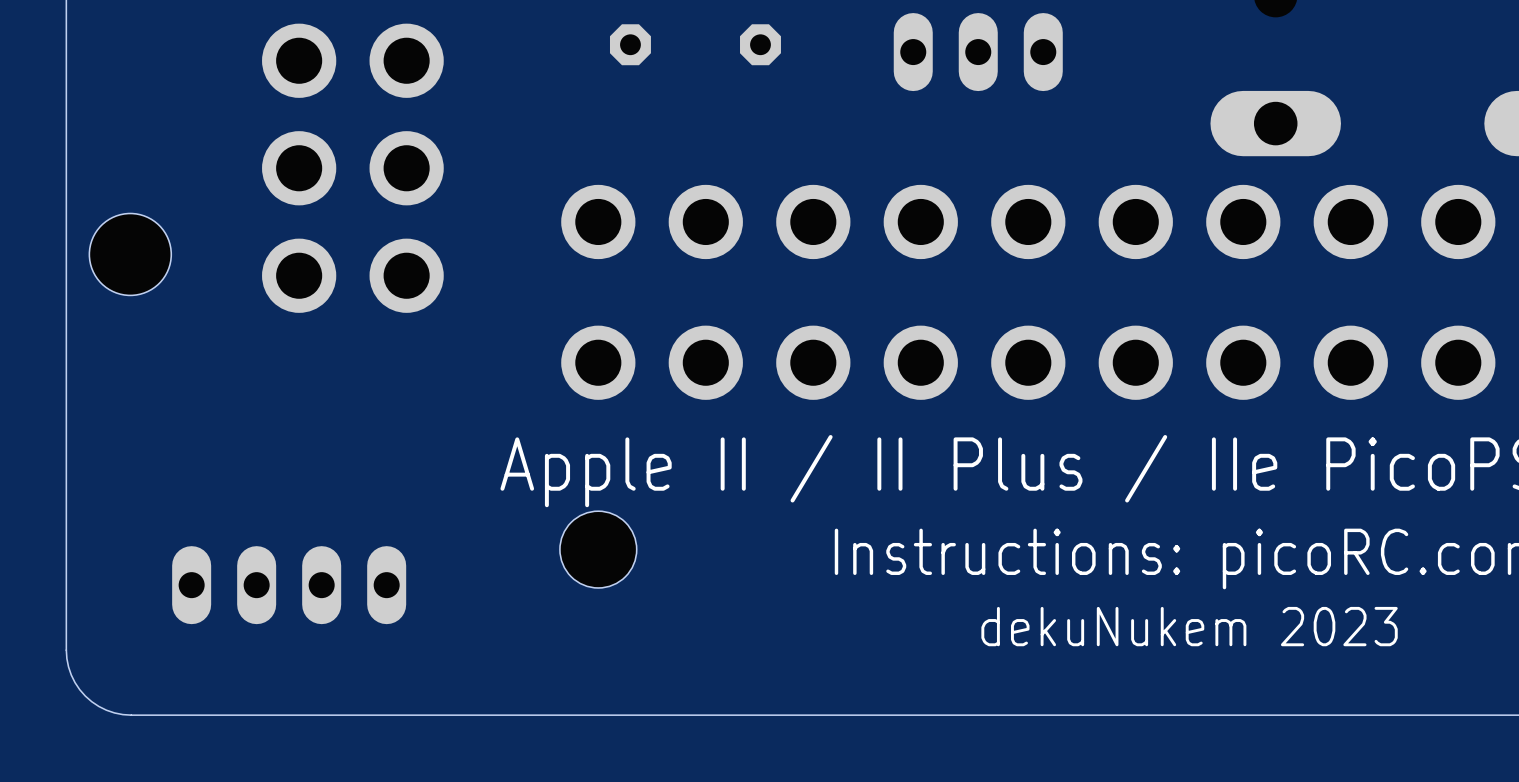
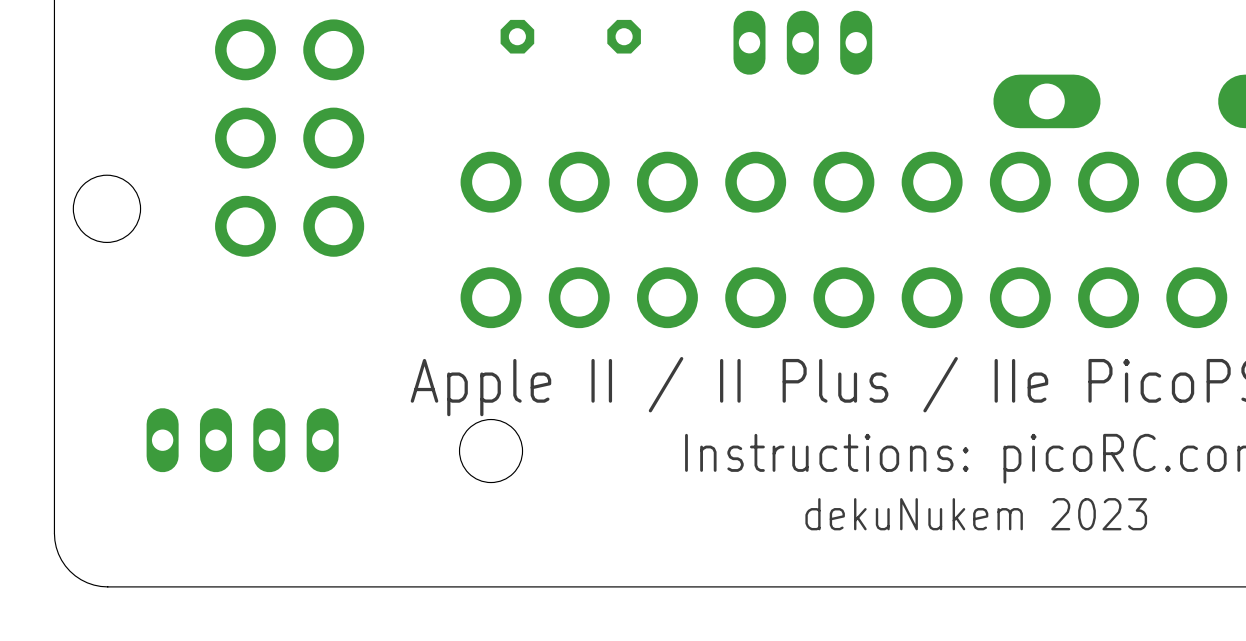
part position: (289, 585) -> (242, 440)

